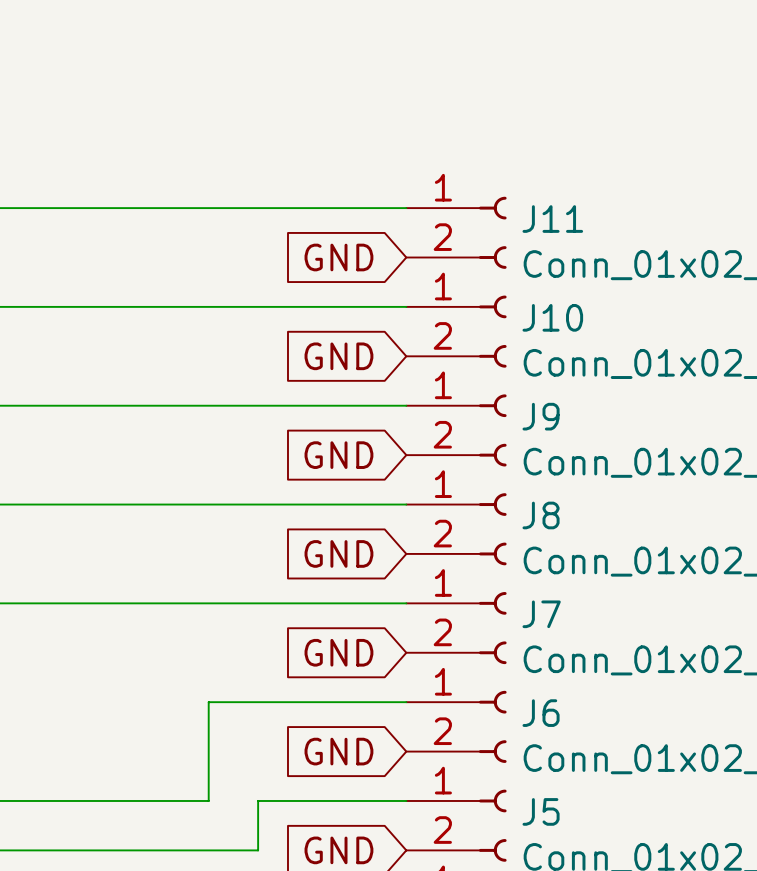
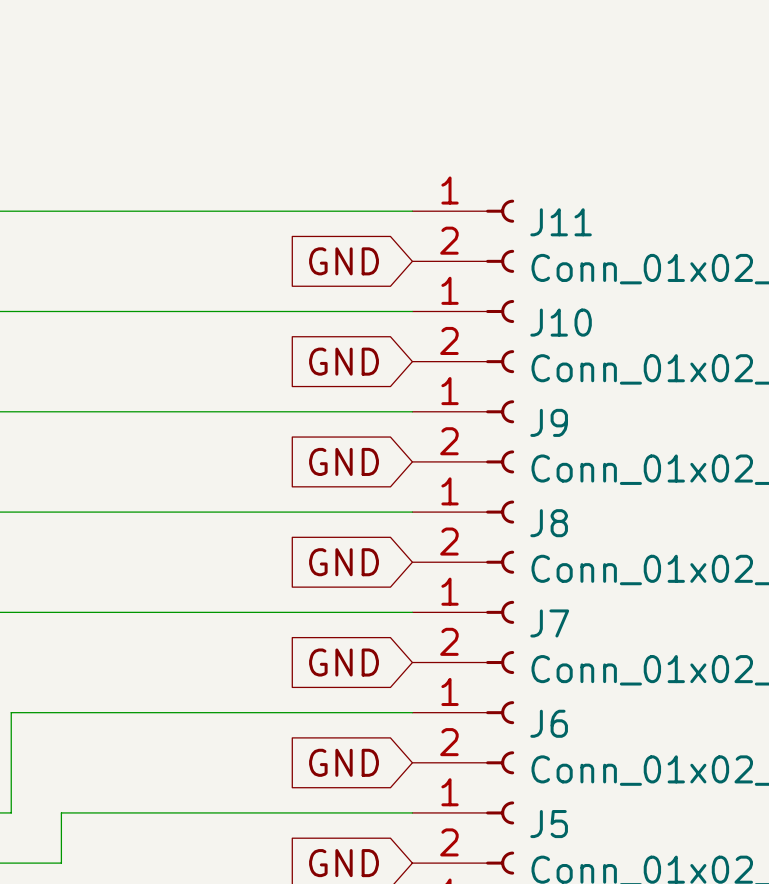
wire: (208, 702) (208, 800) -> (261, 812) (211, 812)
wire: none -> (211, 712) (11, 712) (11, 812)
wire: (11, 800) (60, 800) -> (61, 863) (61, 812)
wire: (258, 800) (258, 850) (60, 850) -> none

